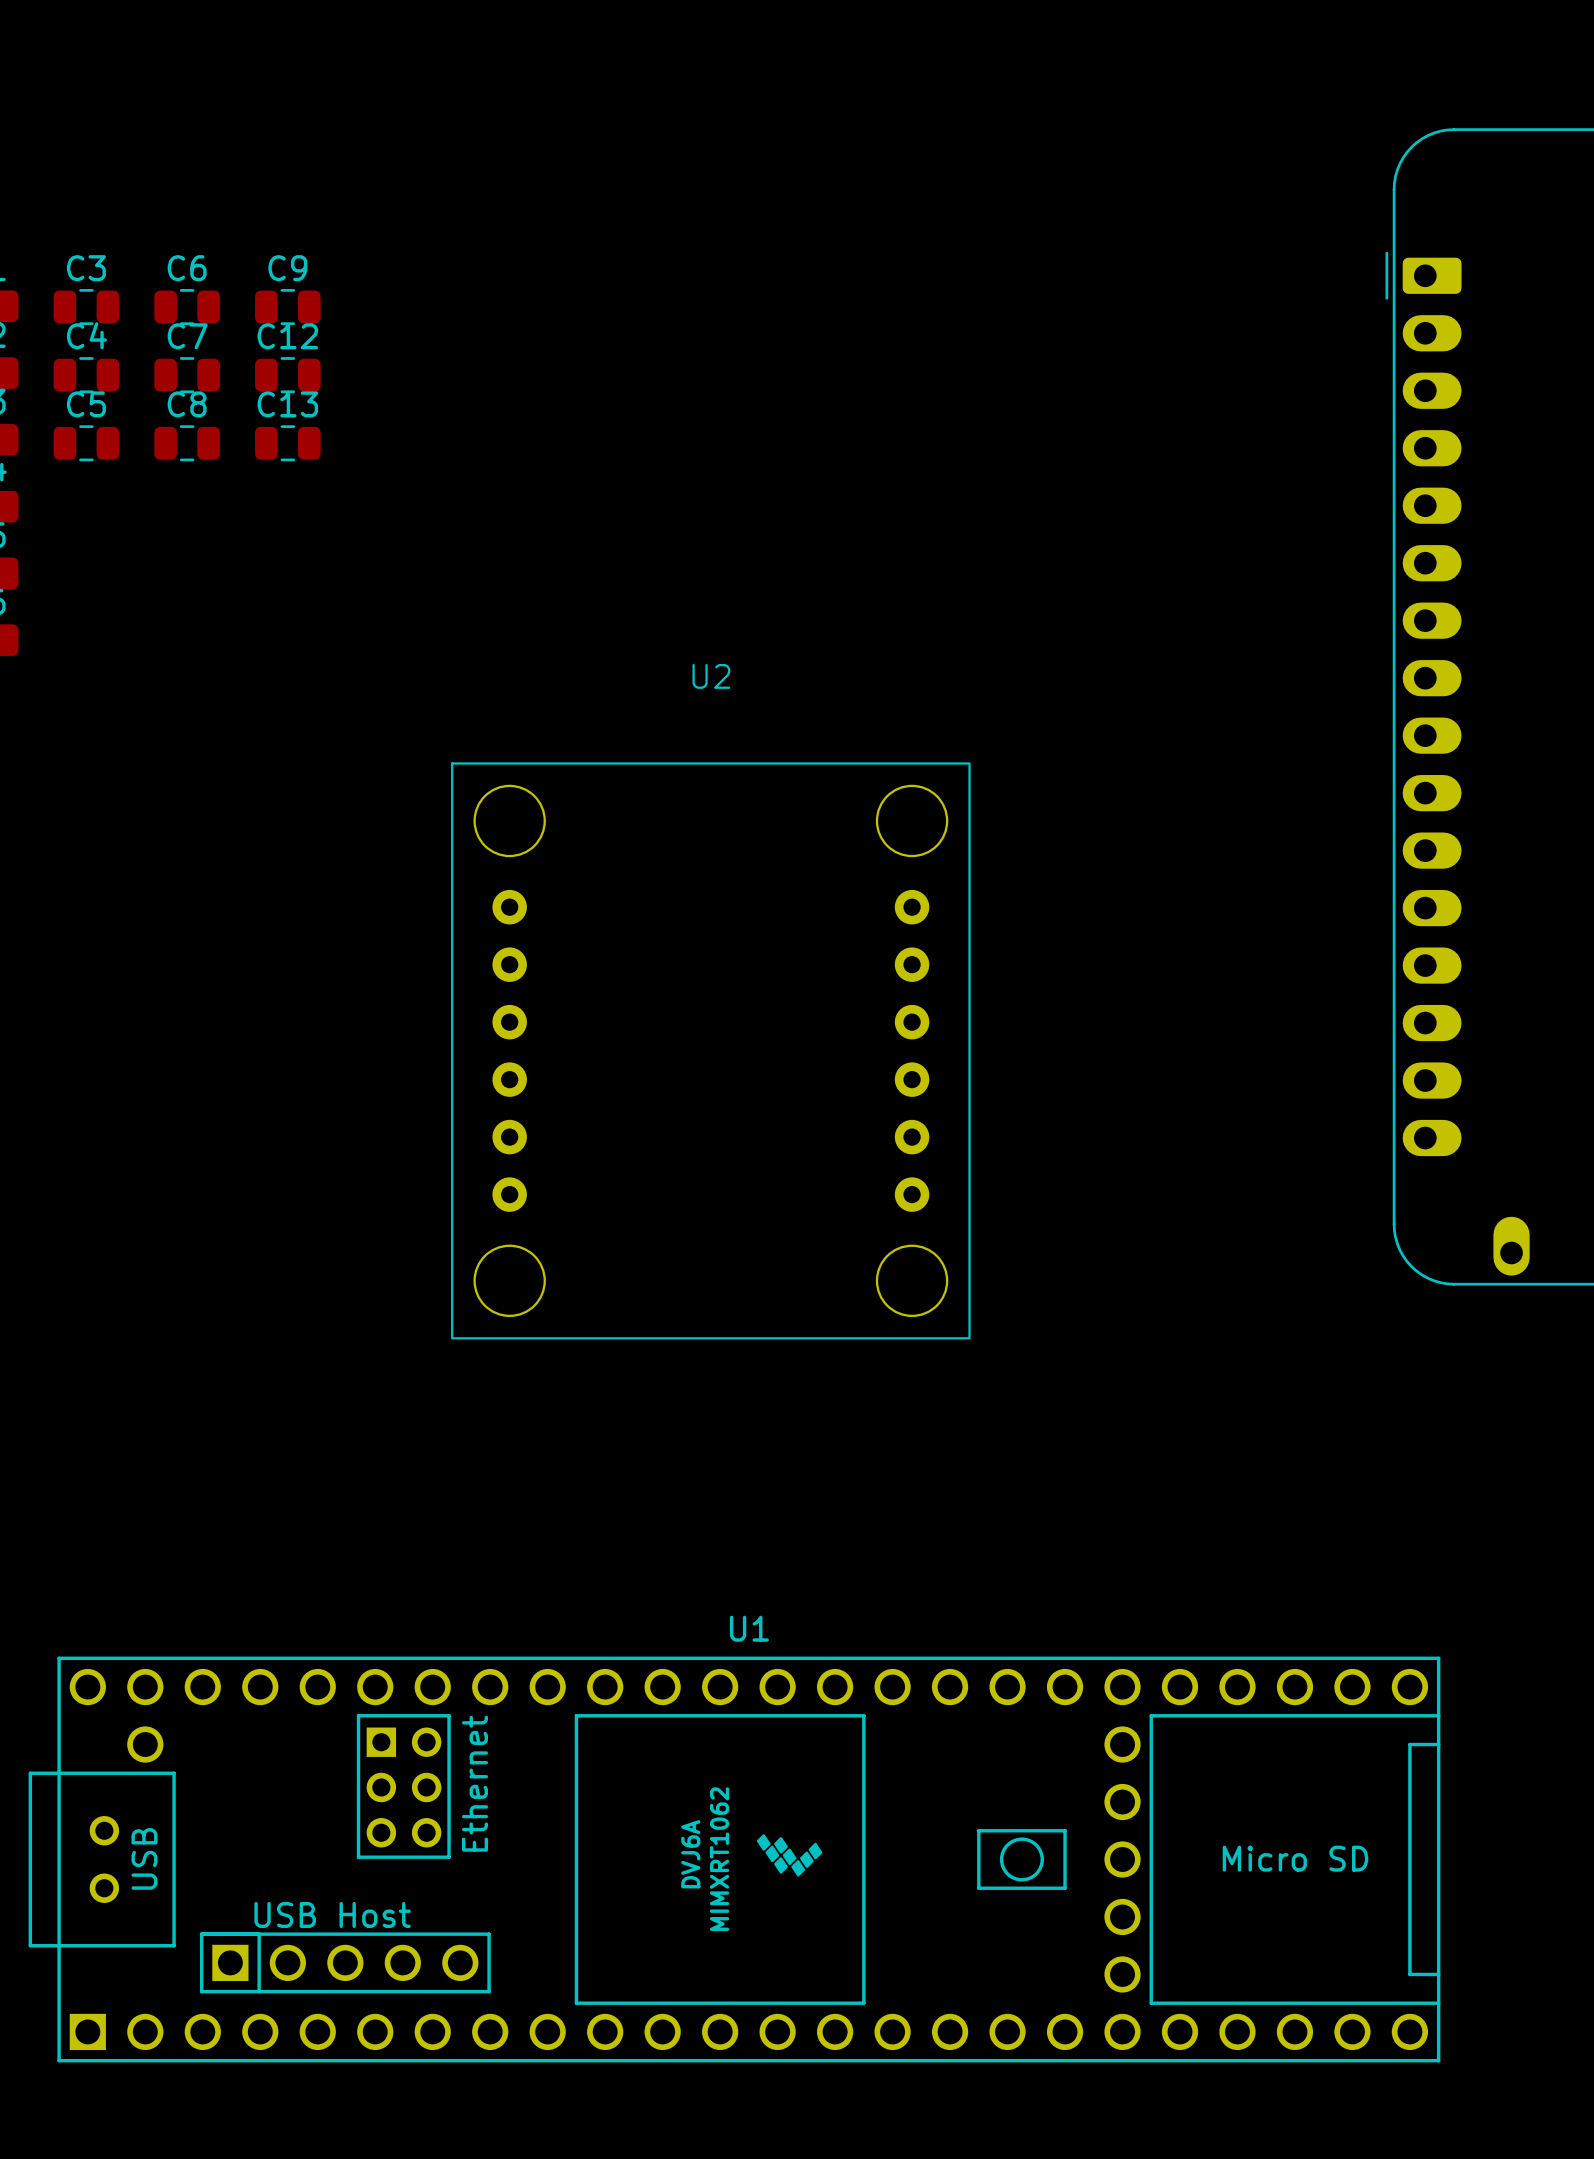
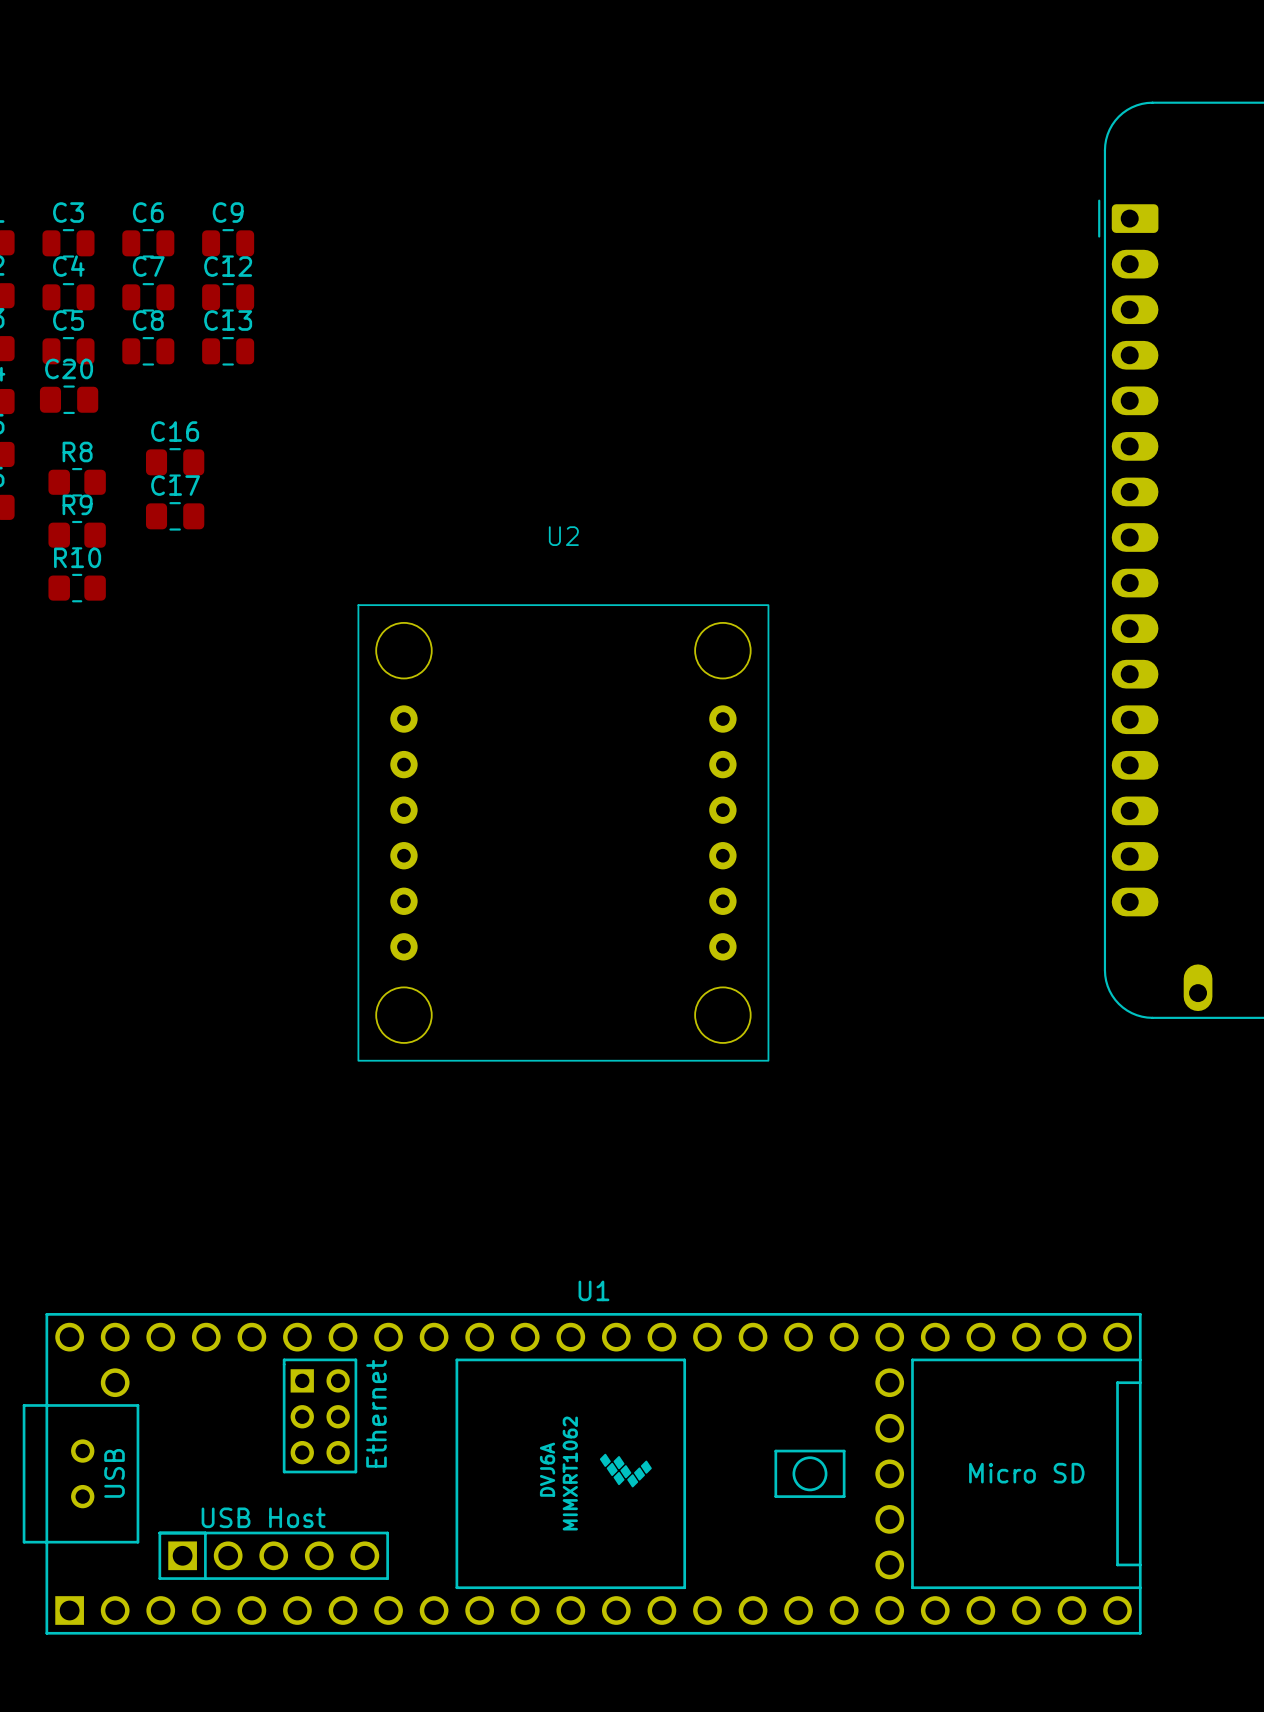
C20: none -> (69, 399)
C16: none -> (175, 462)
R8: none -> (77, 482)
C17: none -> (175, 516)
R9: none -> (77, 535)
R10: none -> (77, 588)

